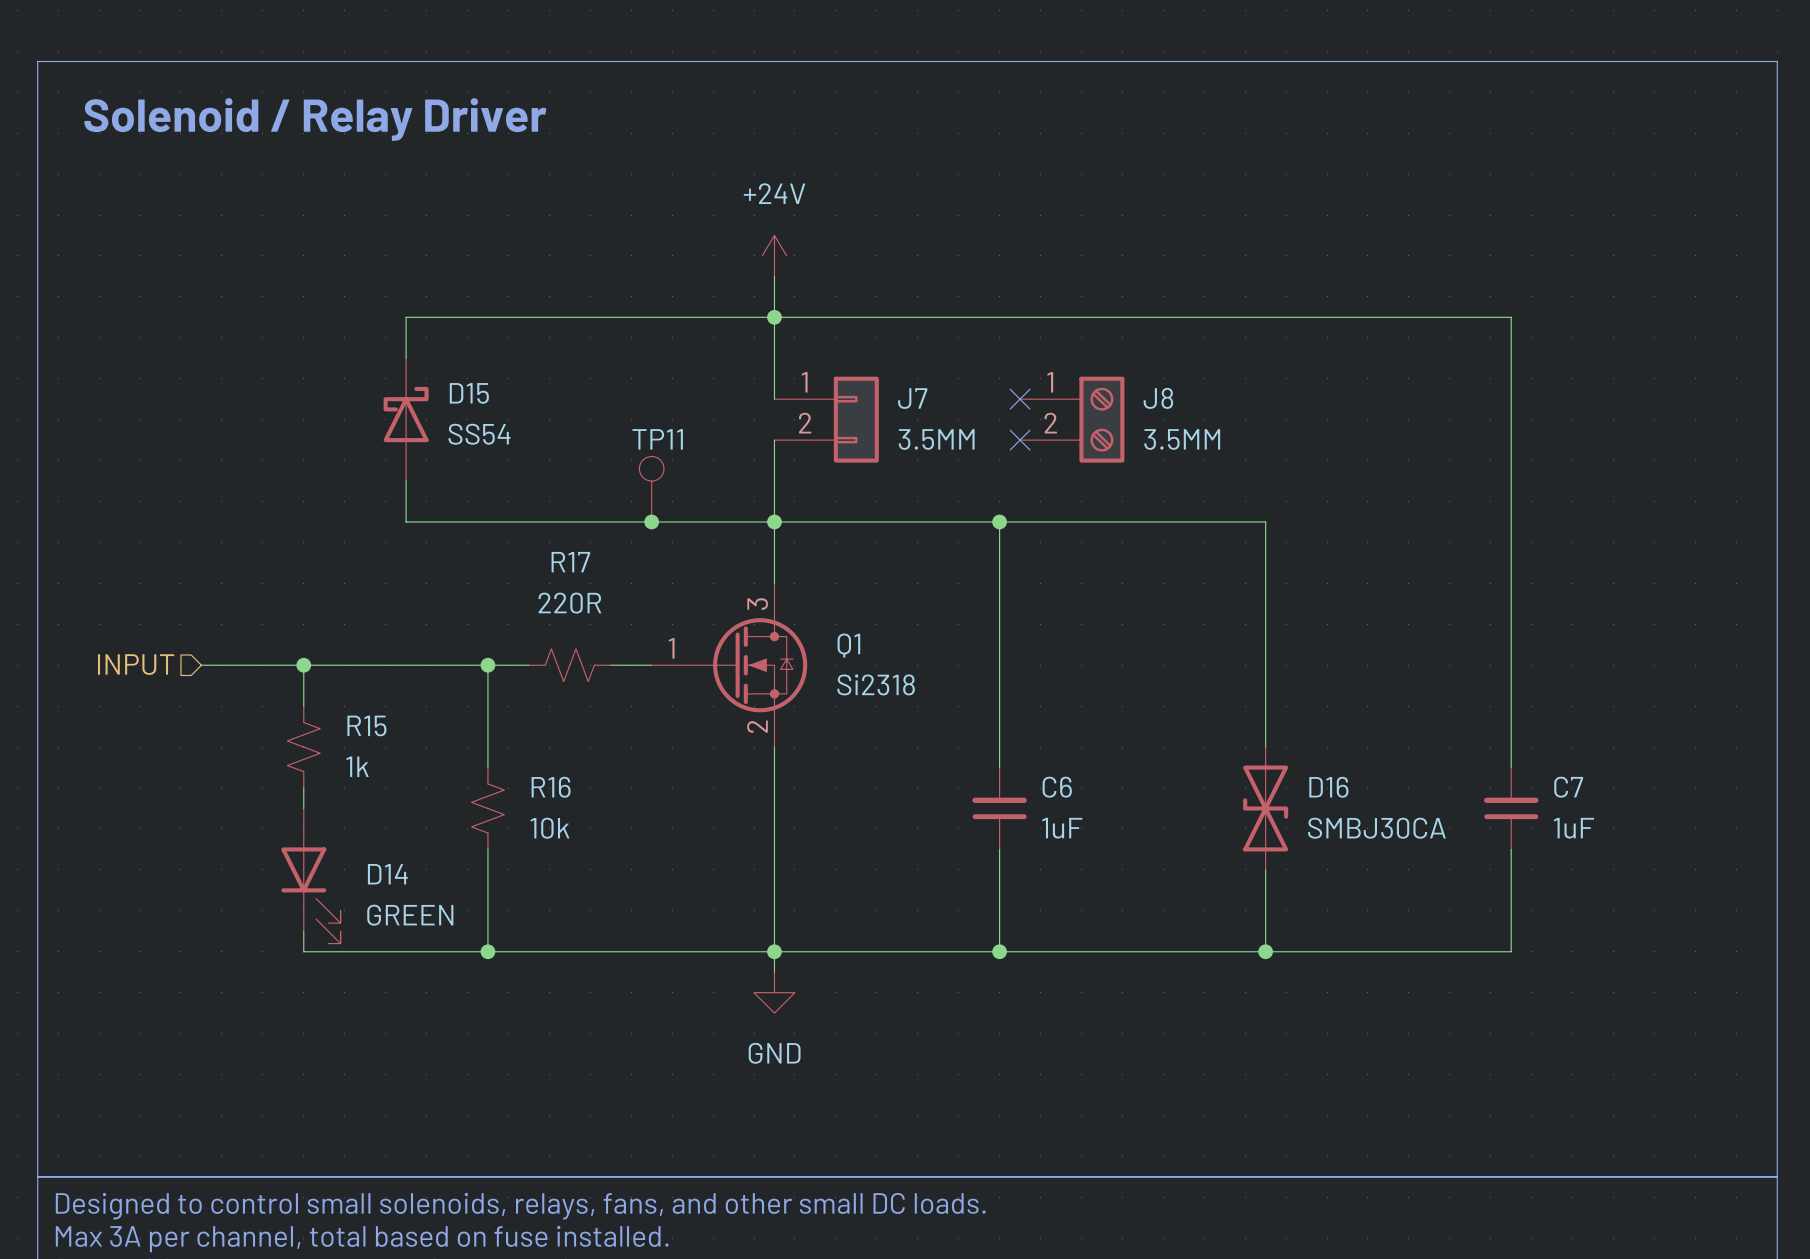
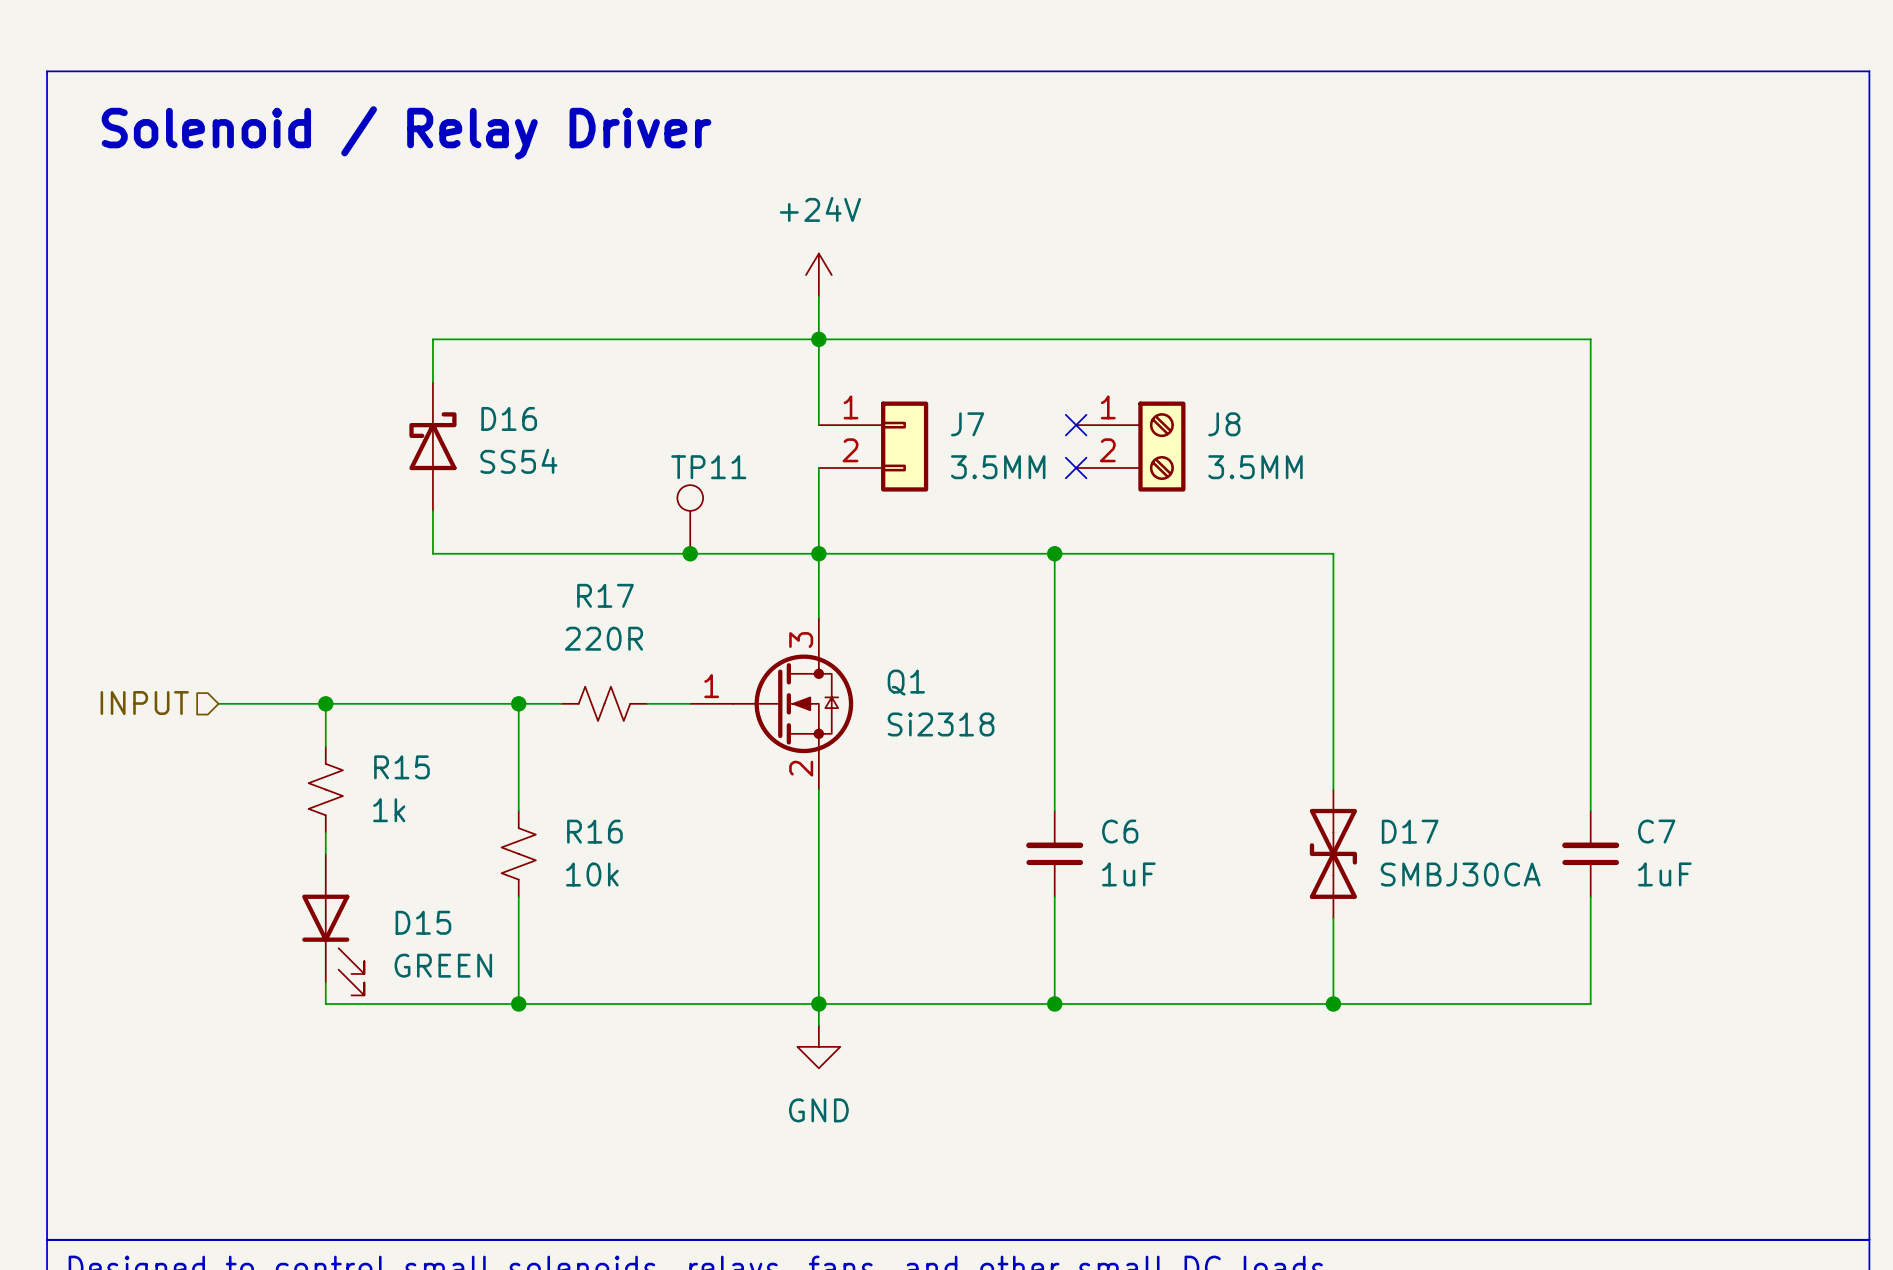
D15 name: D15 (469, 393) -> D16 (509, 418)
D16 name: D16 (1328, 787) -> D17 (1410, 831)
D14 name: D14 (387, 874) -> D15 (423, 922)

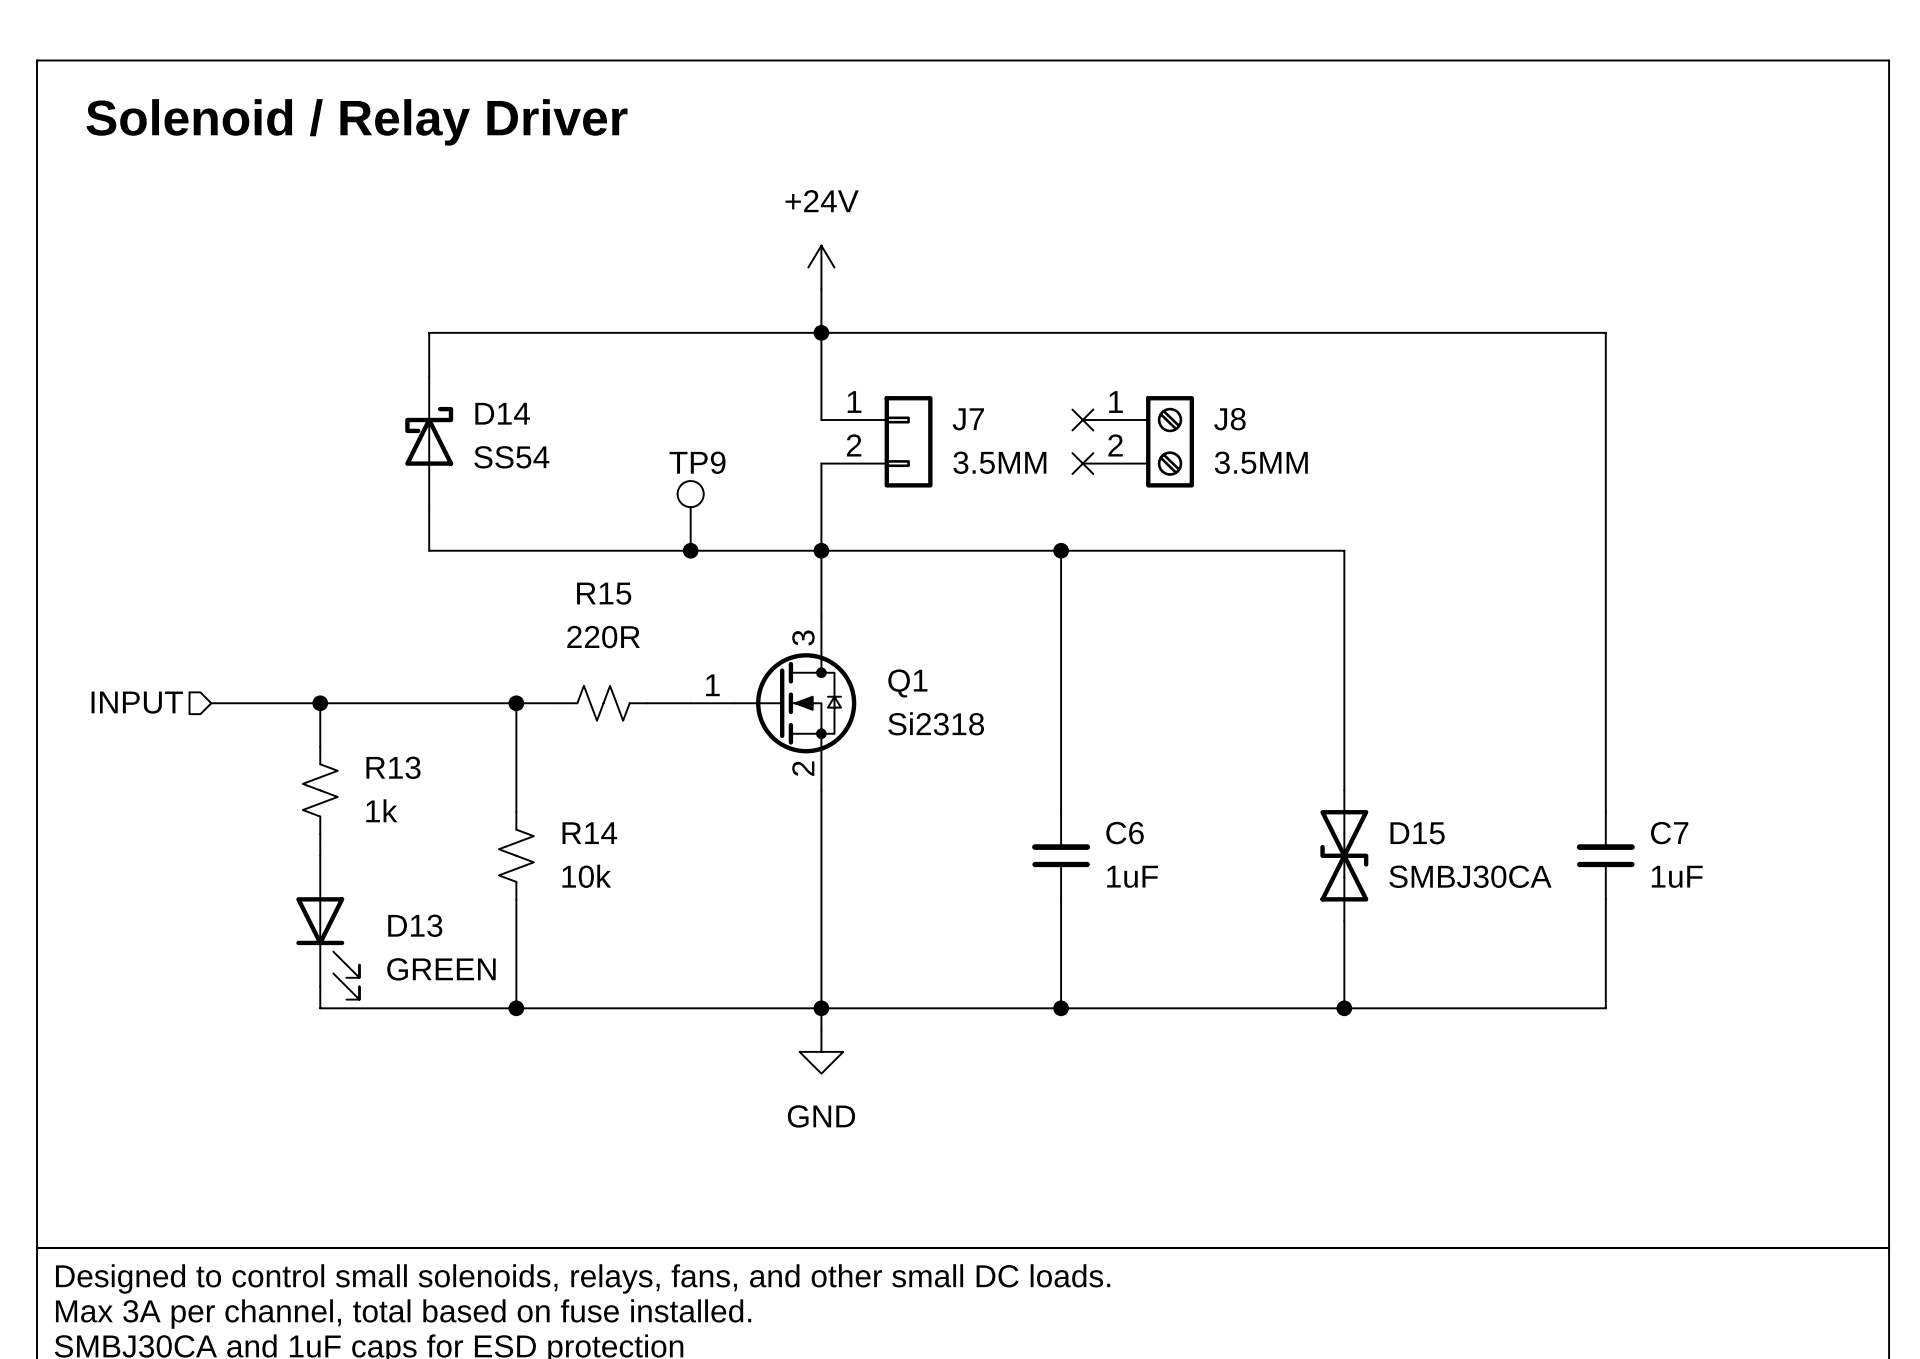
D16 name: D16 (509, 418) -> D14 (502, 413)
TP11 name: TP11 (708, 467) -> TP9 (697, 462)
R17 name: R17 (605, 595) -> R15 (604, 593)
R15 name: R15 (401, 767) -> R13 (393, 767)
R16 name: R16 (594, 831) -> R14 (589, 833)
D17 name: D17 (1410, 831) -> D15 (1417, 833)
D15 name: D15 (423, 922) -> D13 (415, 925)

